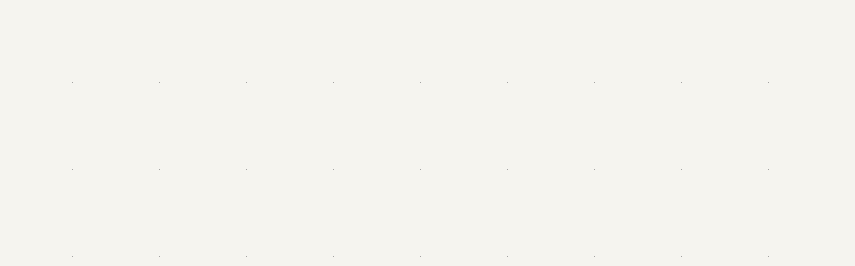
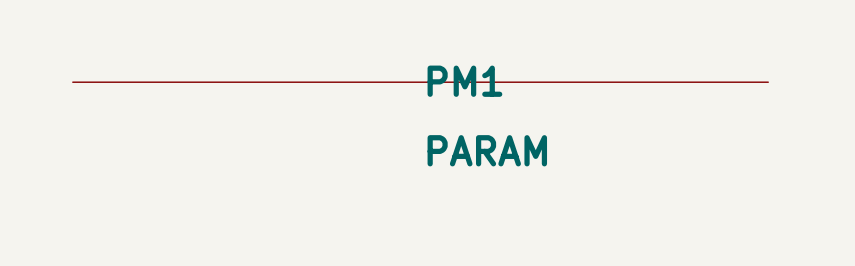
PM1: none -> PARAM (420, 82)

